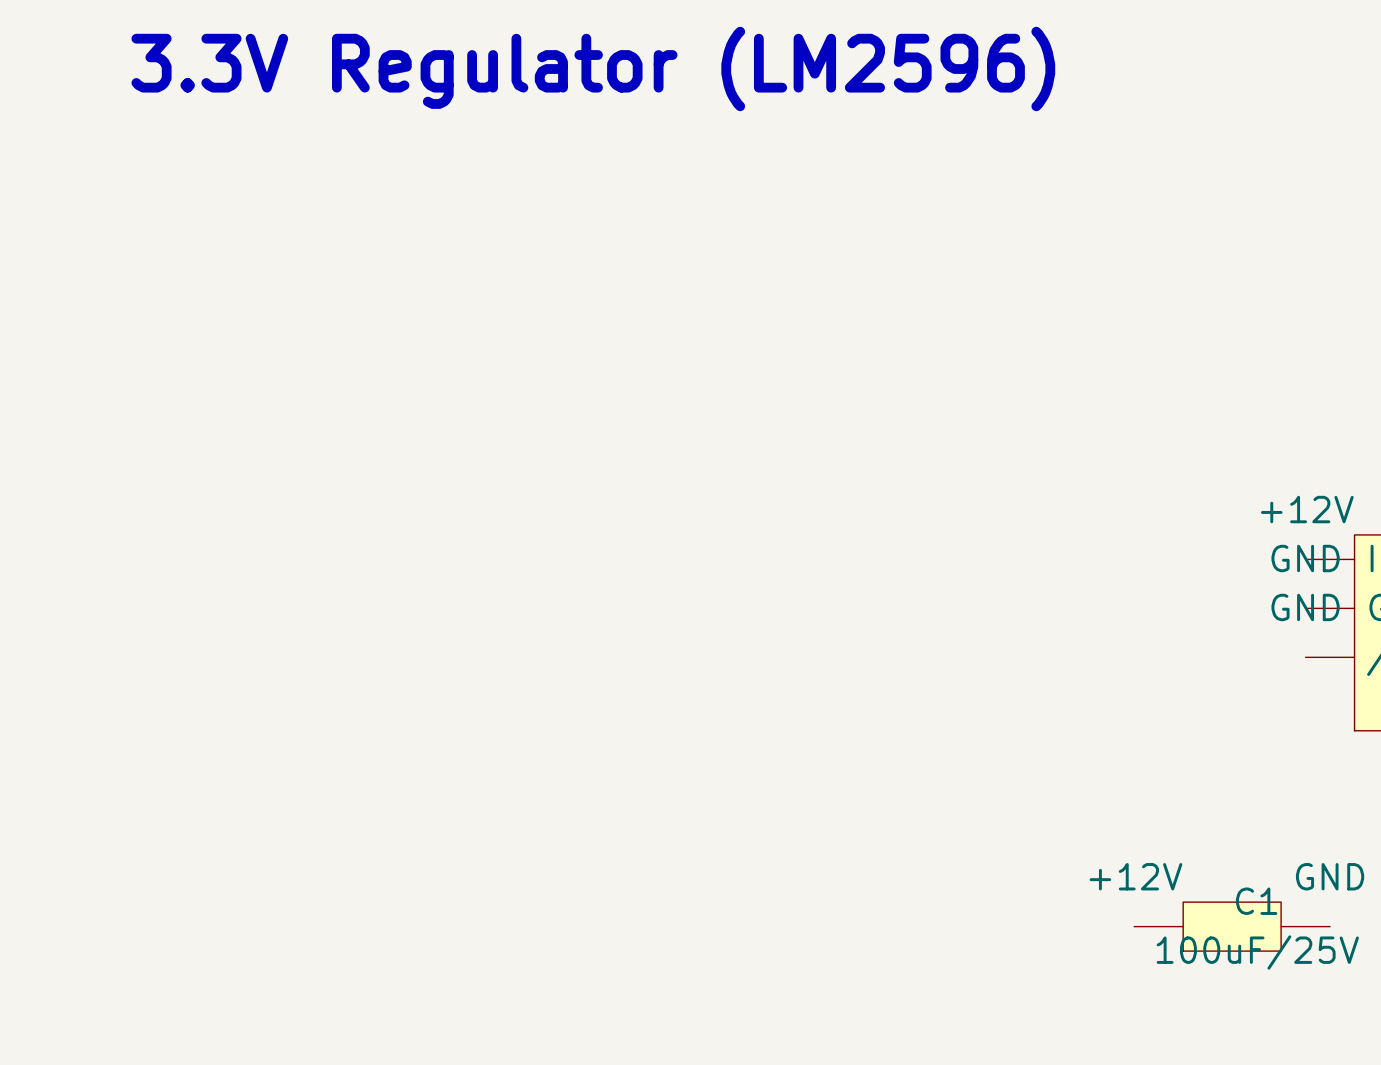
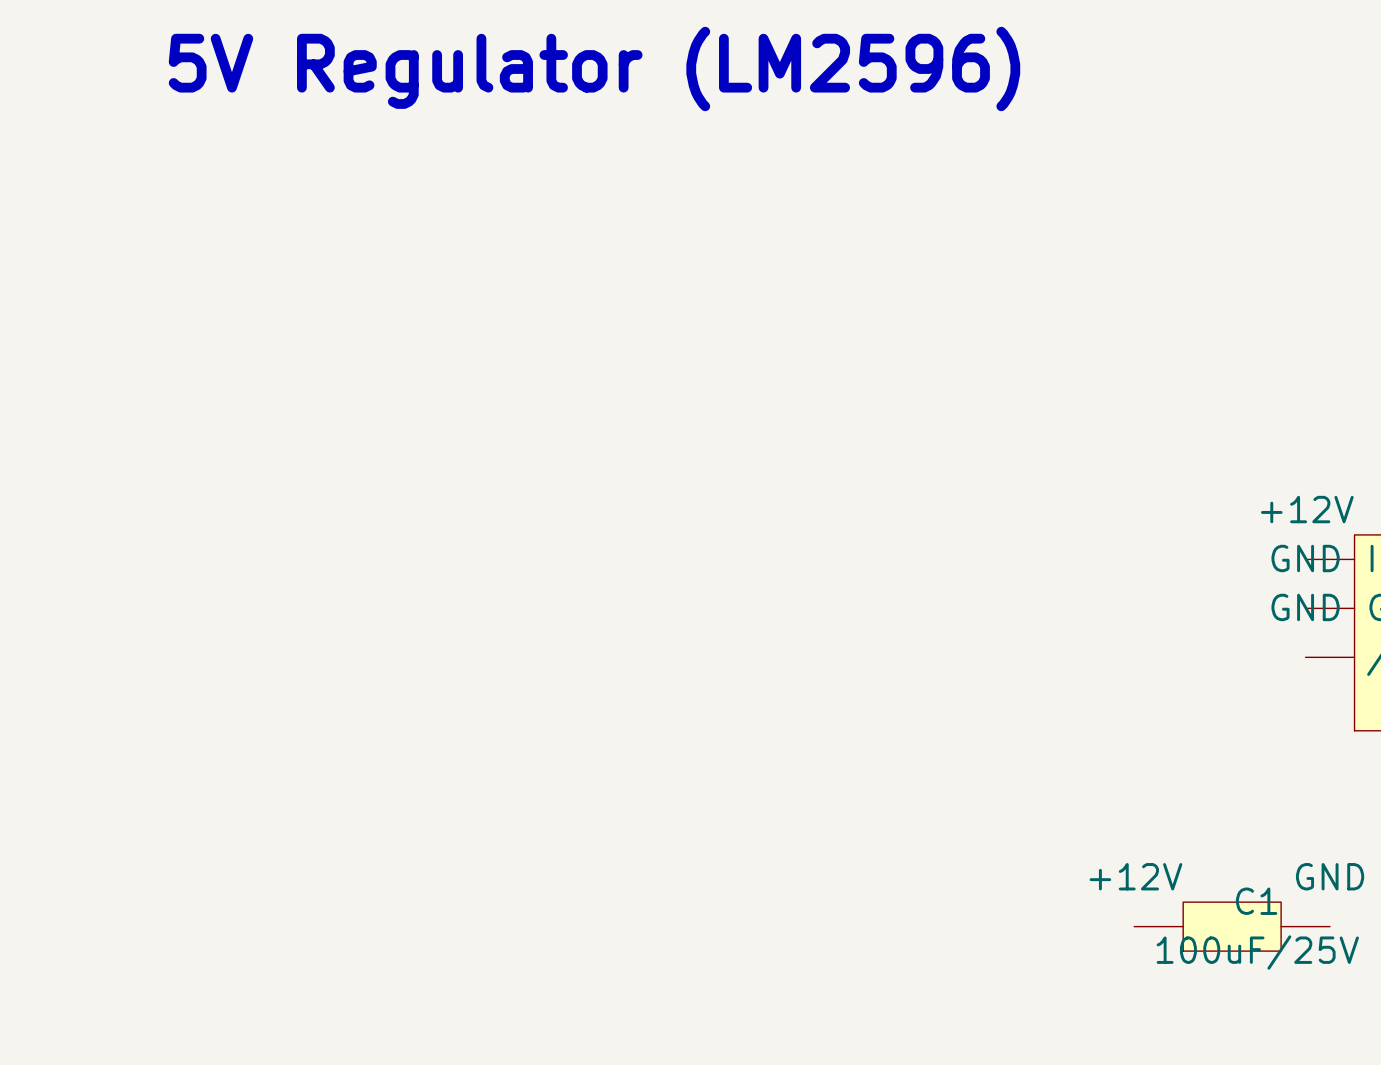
text: 3.3V Regulator (LM2596) (593, 69) -> 5V Regulator (LM2596) (594, 69)

